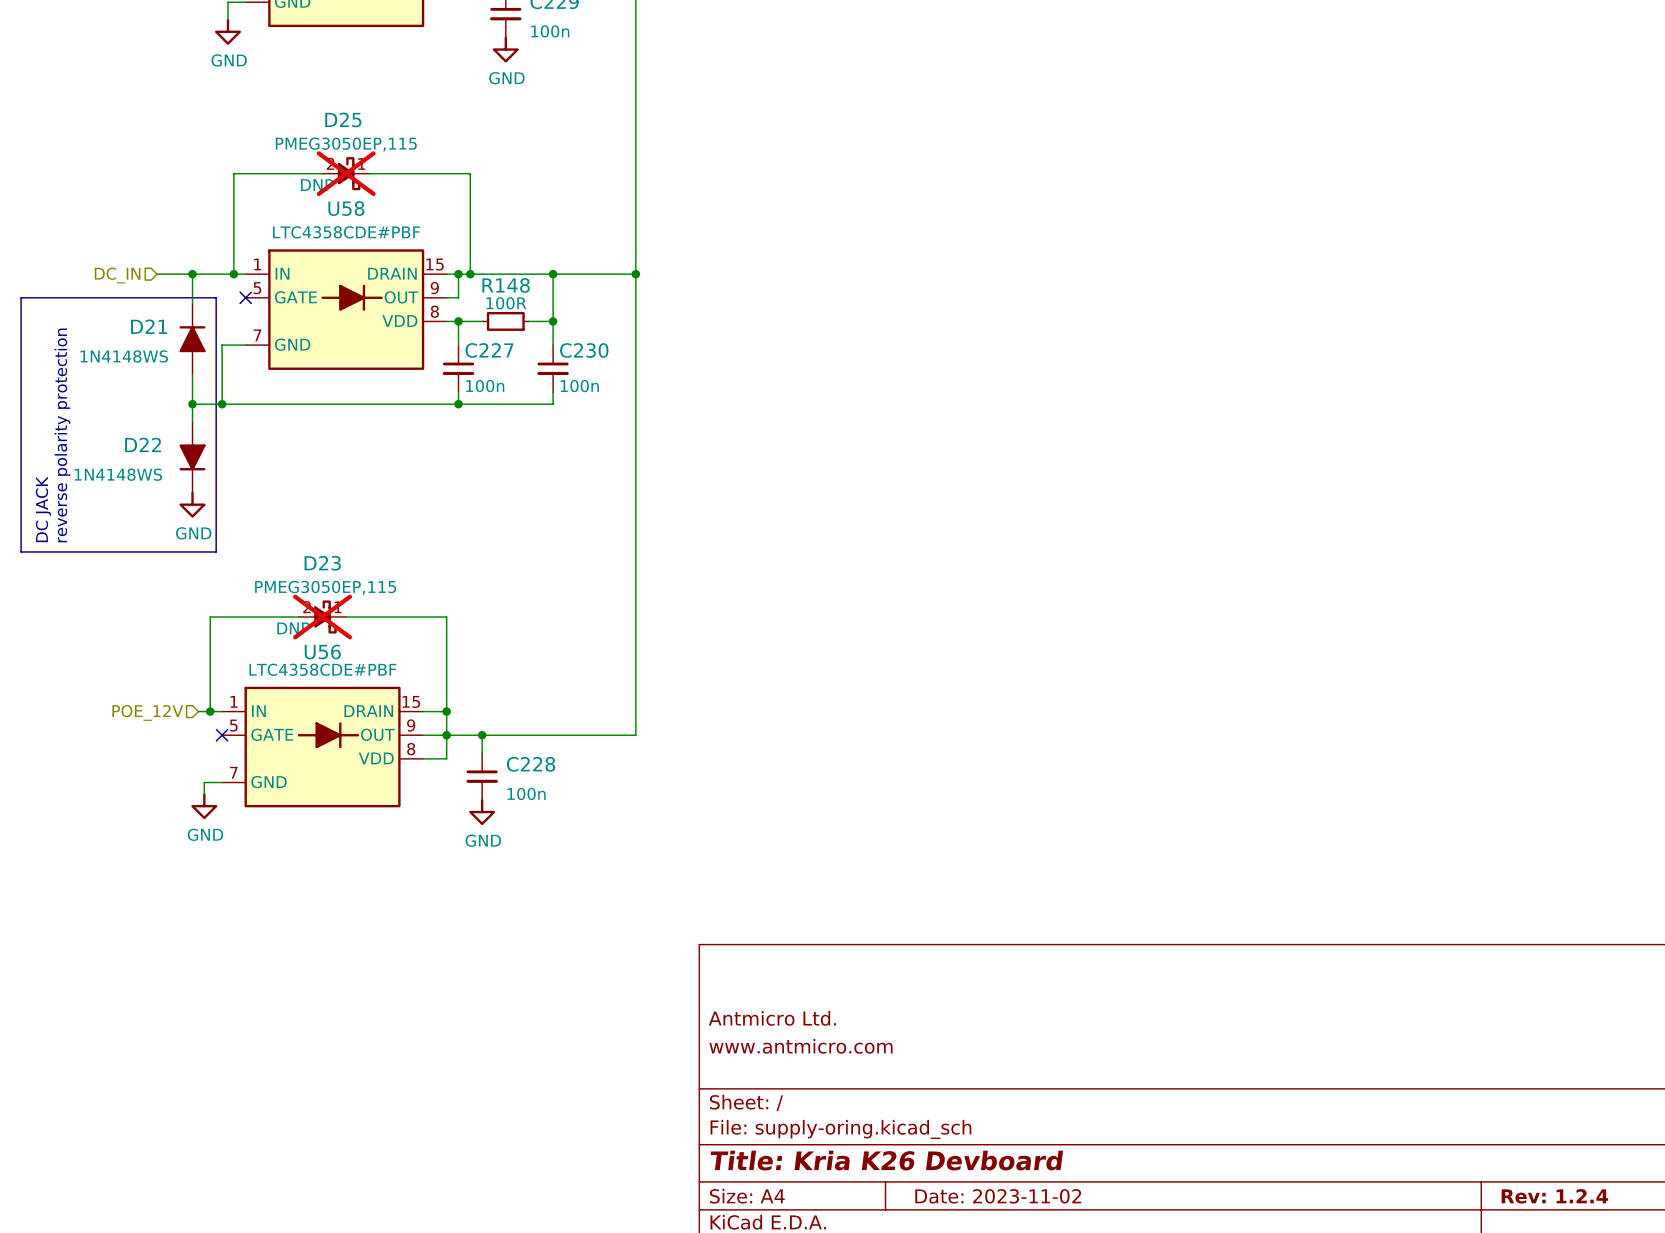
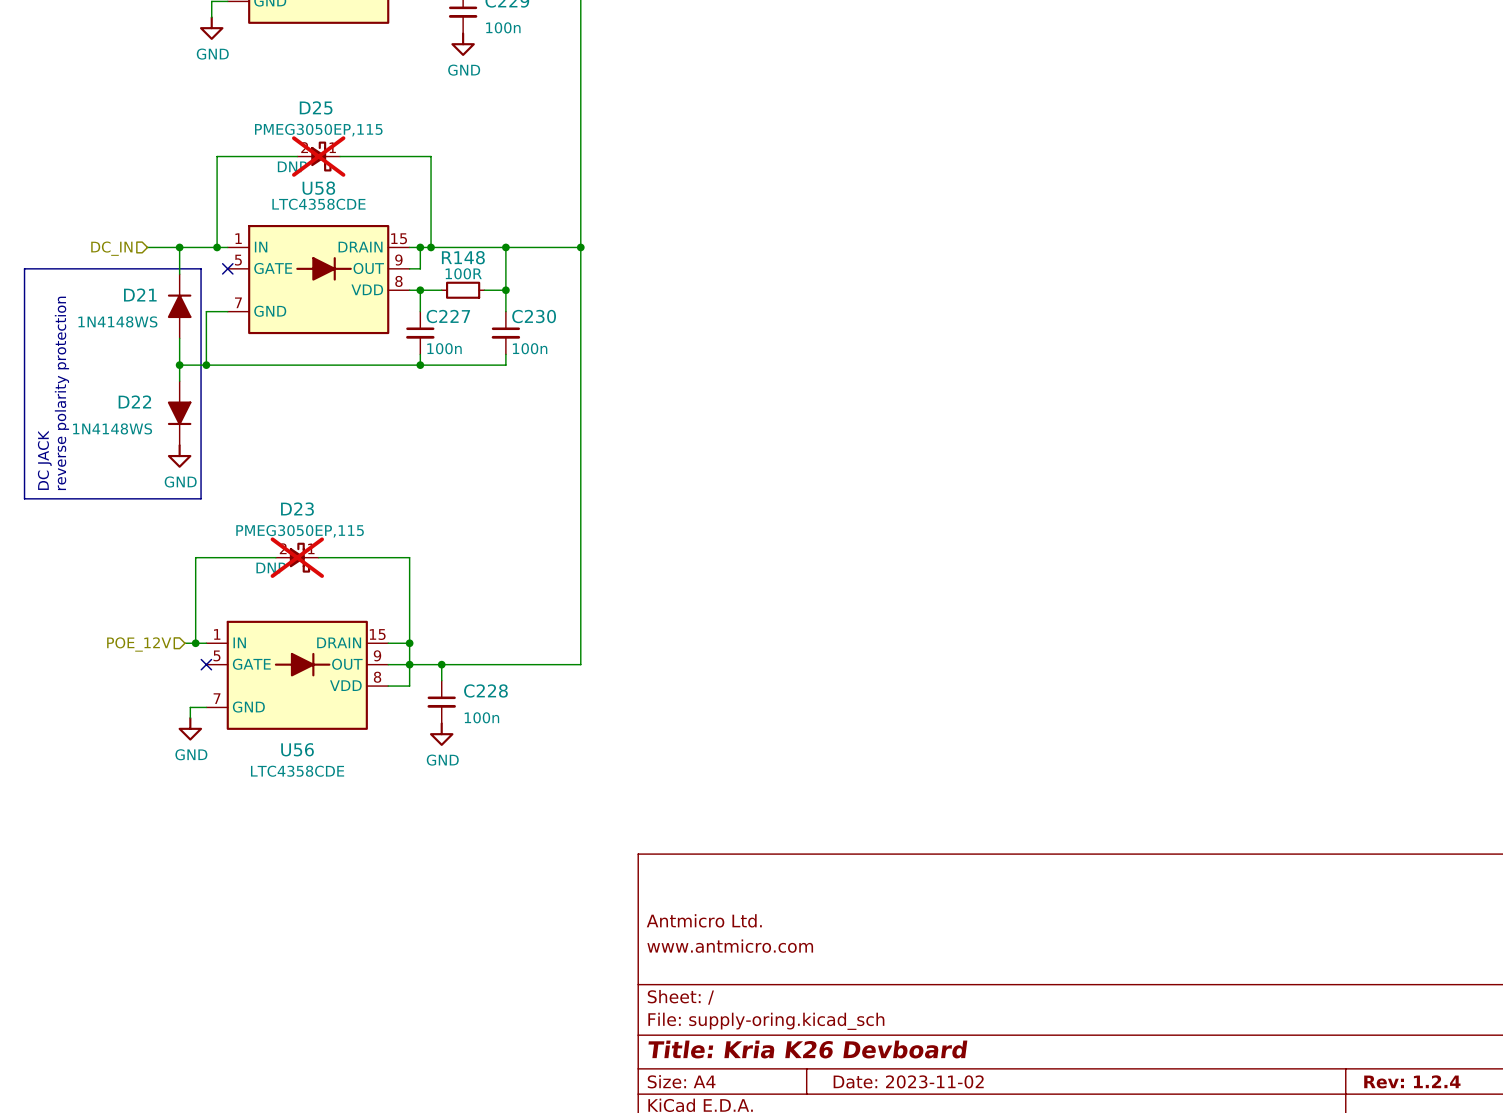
U58 value: none -> LTC4358CDE (318, 204)
U58 text: LTC4358CDE#PBF (346, 232) -> none
U56 name position: U56 (322, 651) -> U56 (297, 749)
U56 text: LTC4358CDE#PBF (322, 669) -> none
U56 value: none -> LTC4358CDE (297, 771)

